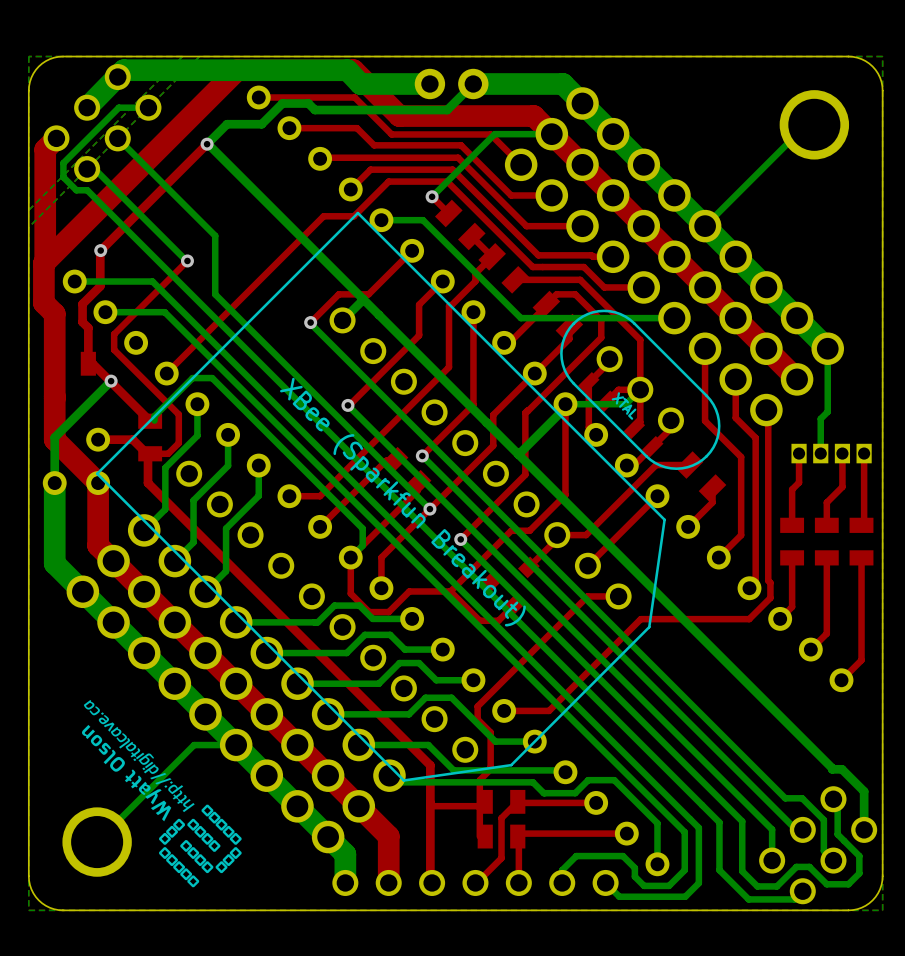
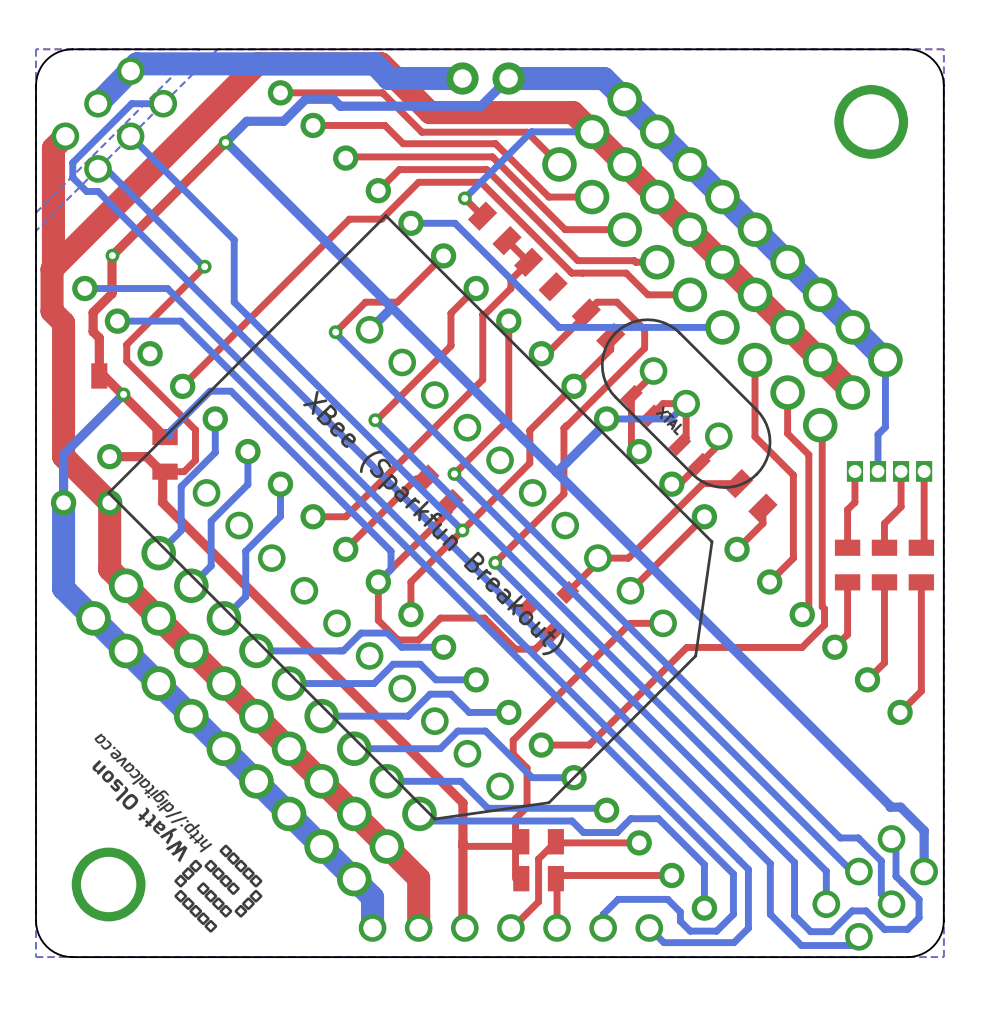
bottom track: (814, 124) (806, 124) (705, 226) -> none
top track: (515, 279) (580, 279) (640, 339) (640, 389) -> none
top track: (565, 404) (565, 494) (529, 530) (511, 530) (450, 591) -> none
bottom track: (236, 745) (194, 745) (97, 842) -> none

